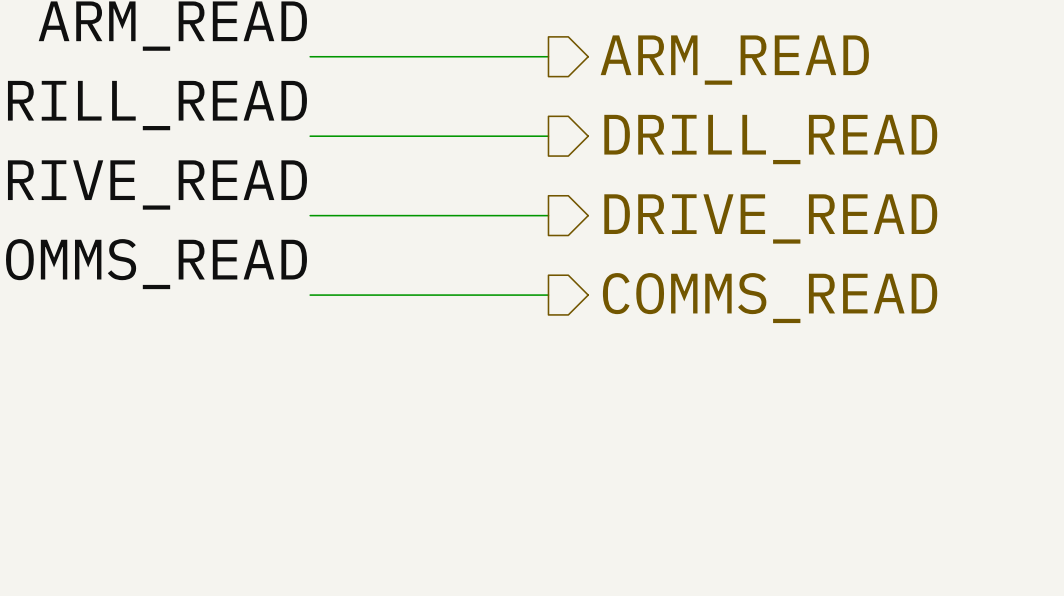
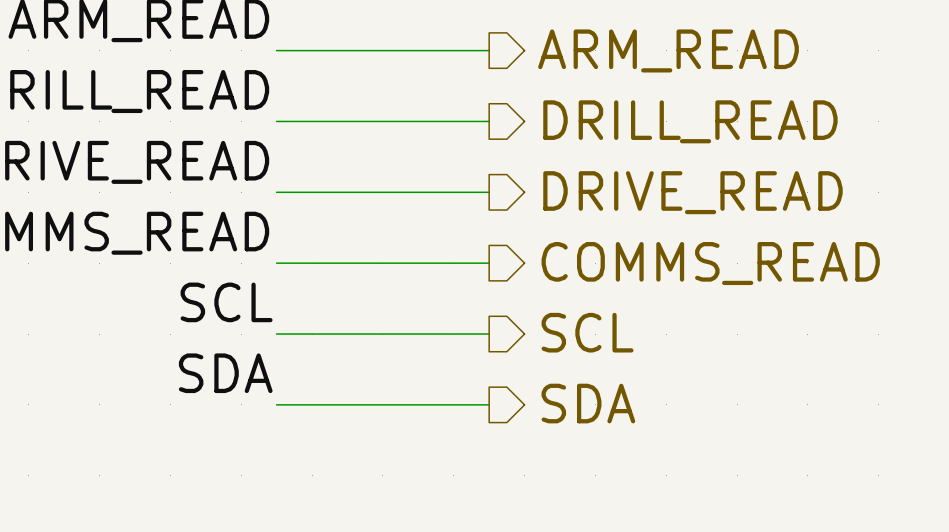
label: none -> SCL (226, 302)
hierarchical label: none -> SCL (587, 332)
wire: none -> (276, 334) (489, 334)
label: none -> SDA (225, 373)
hierarchical label: none -> SDA (588, 403)
wire: none -> (276, 404) (489, 404)

